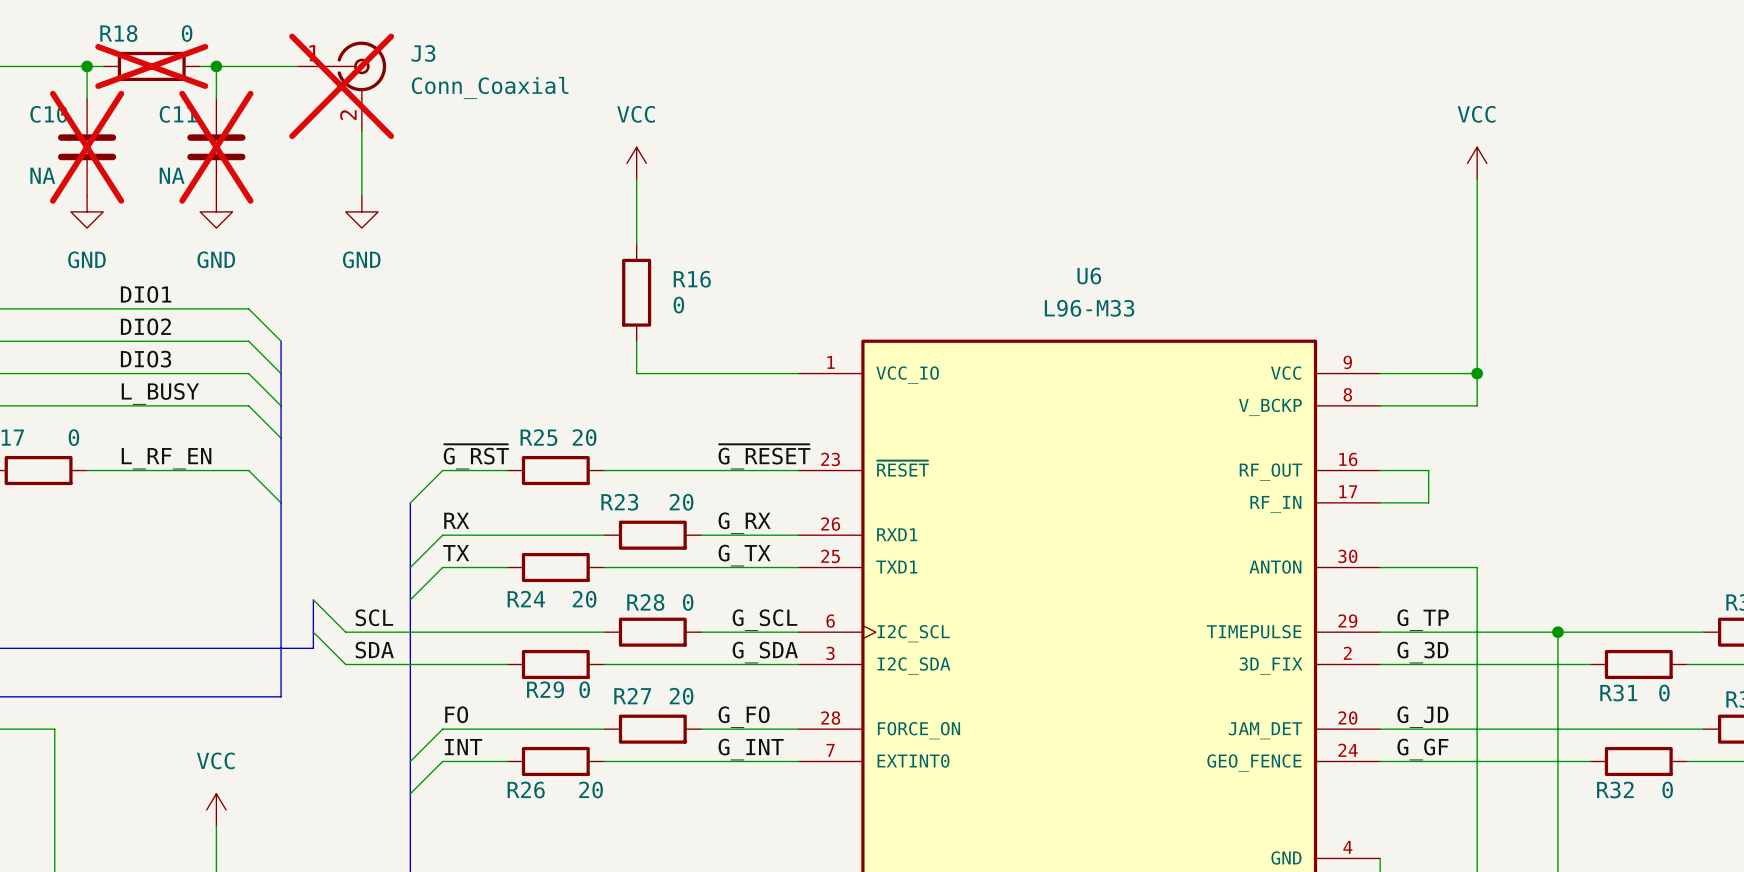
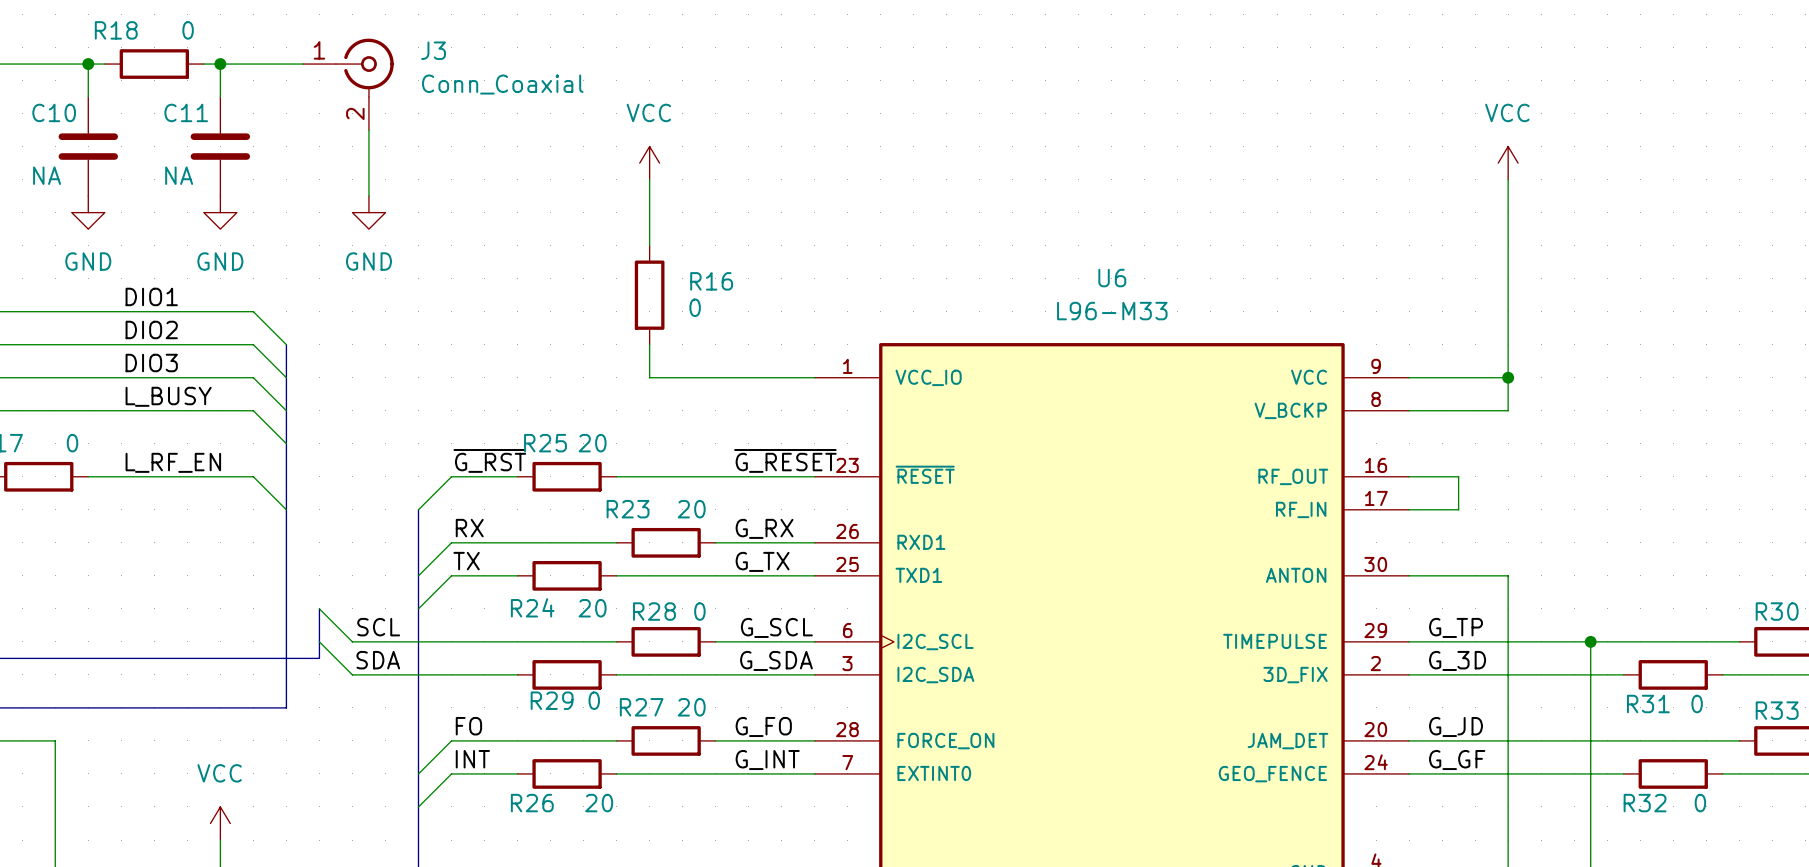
R18 do-not-place cross: (151, 66) -> none
J3 do-not-place cross: (341, 86) -> none
C10 do-not-place cross: (87, 147) -> none
C11 do-not-place cross: (216, 147) -> none

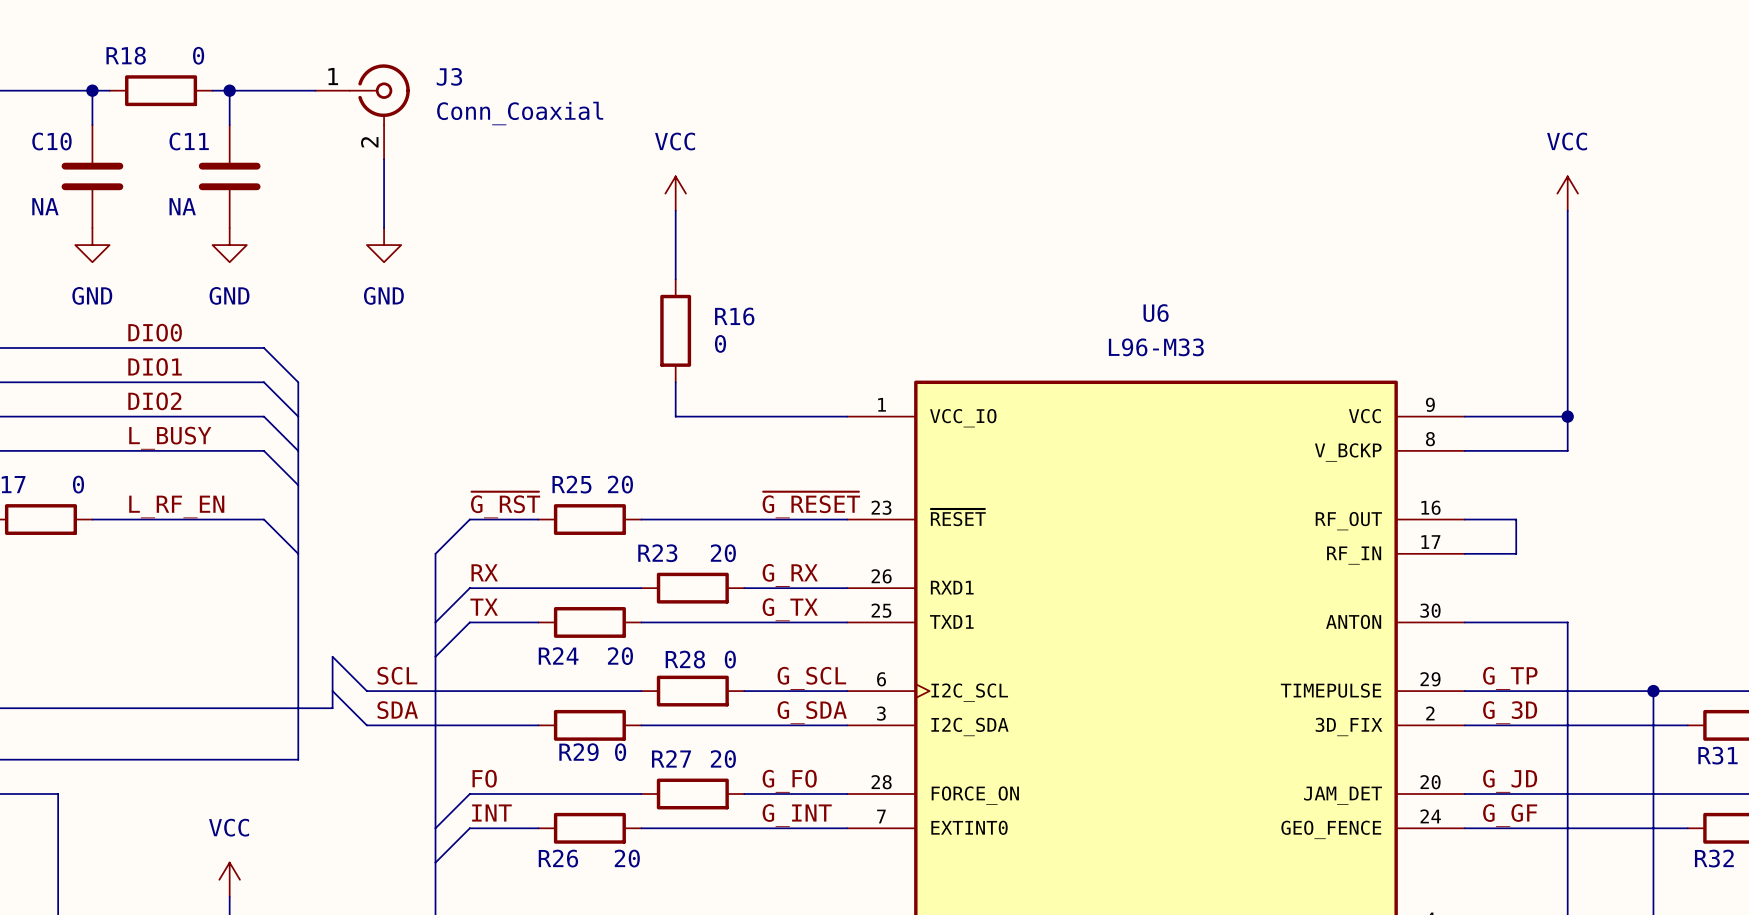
label: DIO1 (151, 296) -> DIO0 (155, 332)
label: DIO2 (151, 329) -> DIO1 (155, 367)
label: DIO3 (151, 362) -> DIO2 (154, 401)

